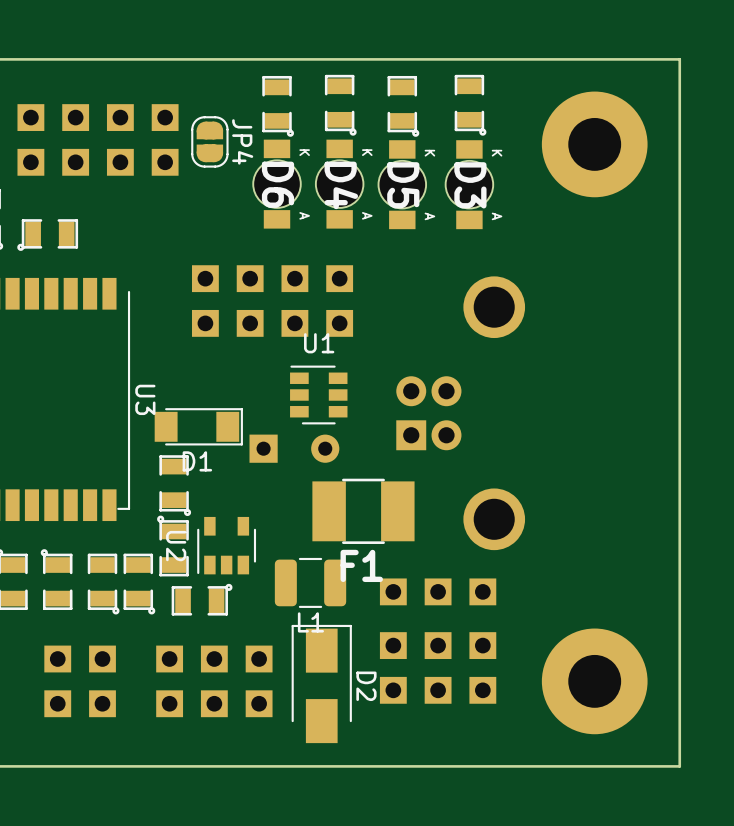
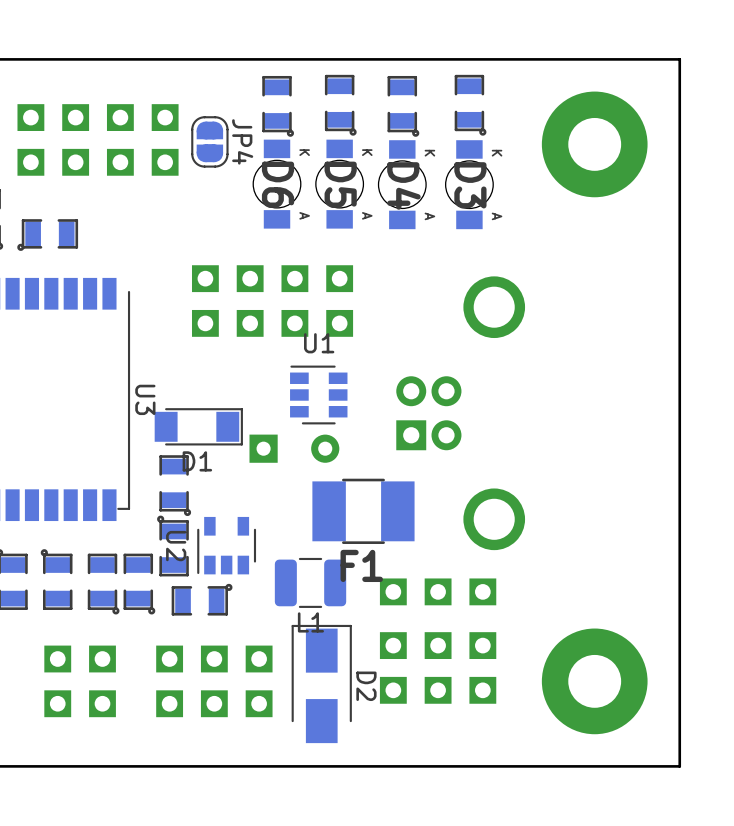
D4 name: D4 (341, 185) -> D5 (340, 184)
D5 name: D5 (403, 185) -> D4 (403, 185)

